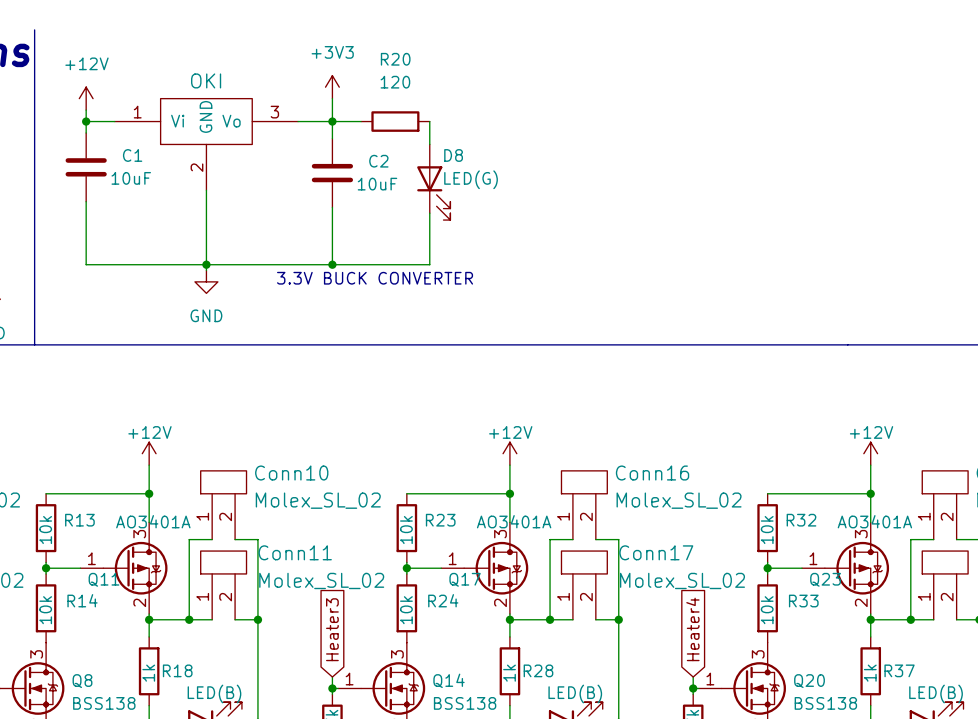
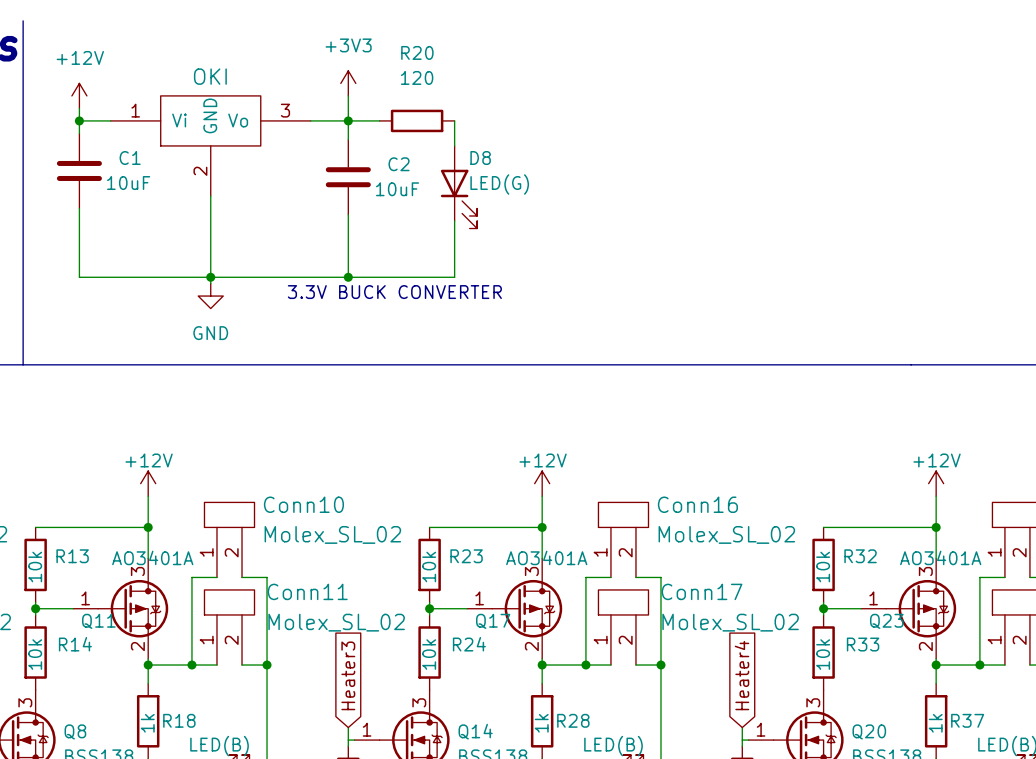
junction: (332, 688) -> none
junction: (693, 688) -> none

